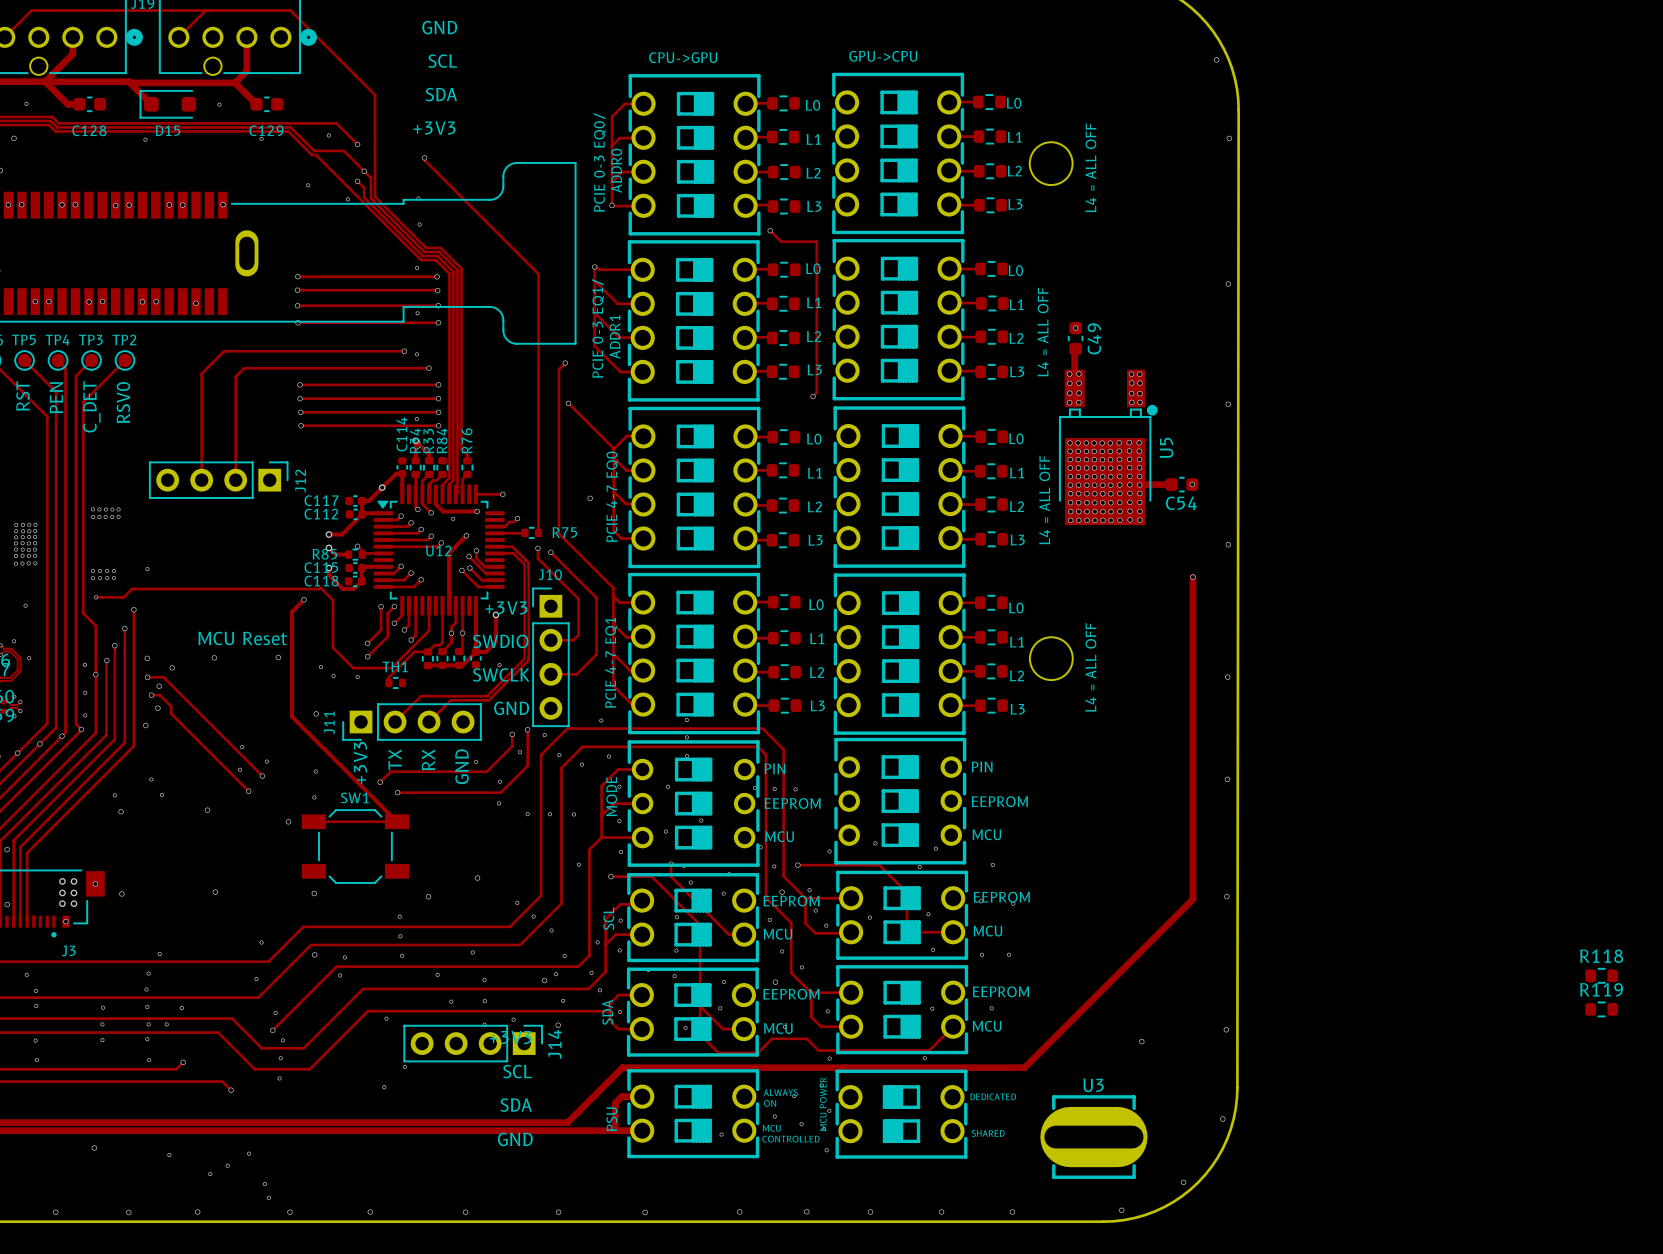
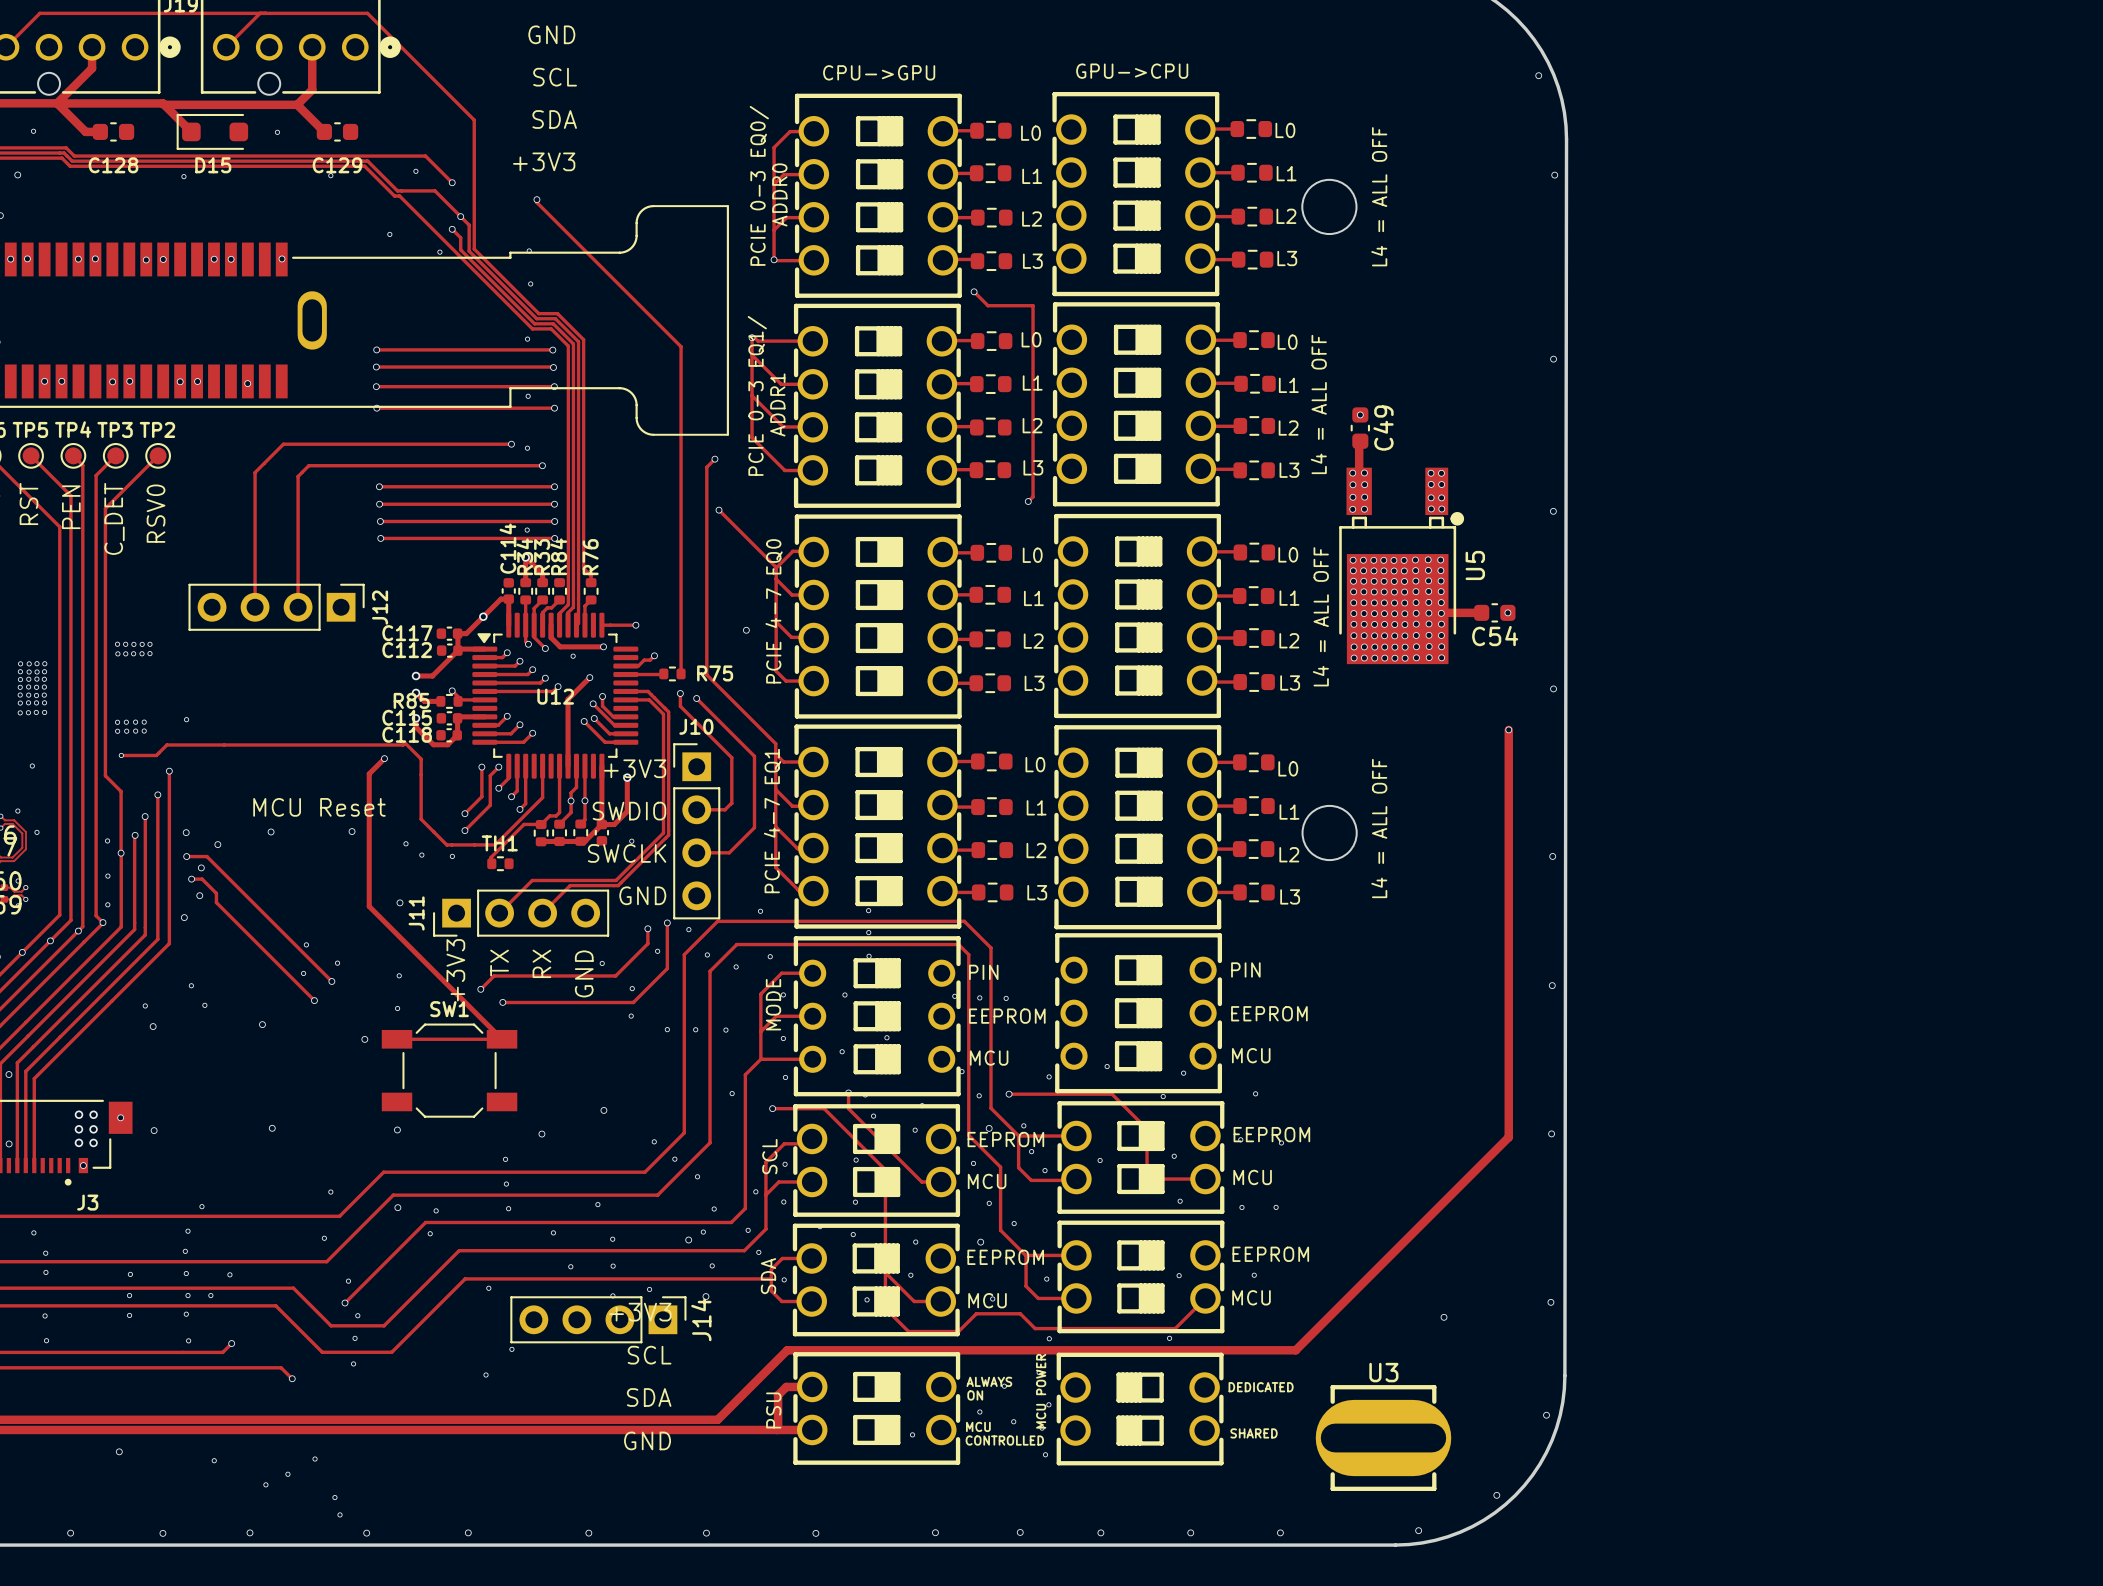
R118: (1601, 975) -> none
R119: (1601, 1009) -> none

